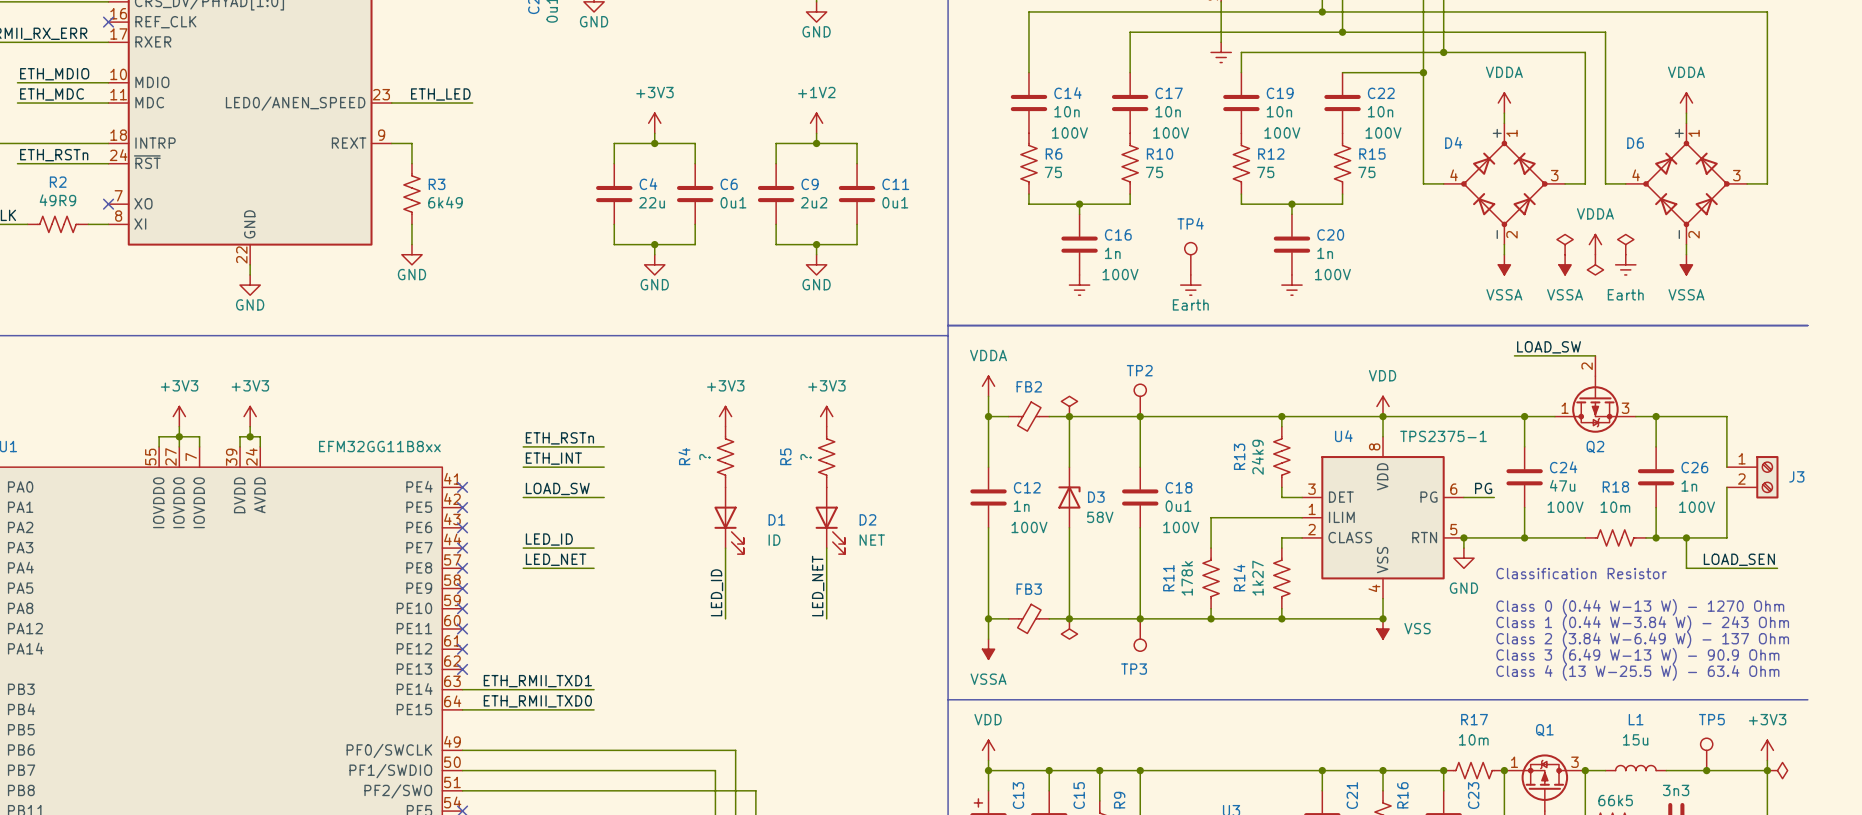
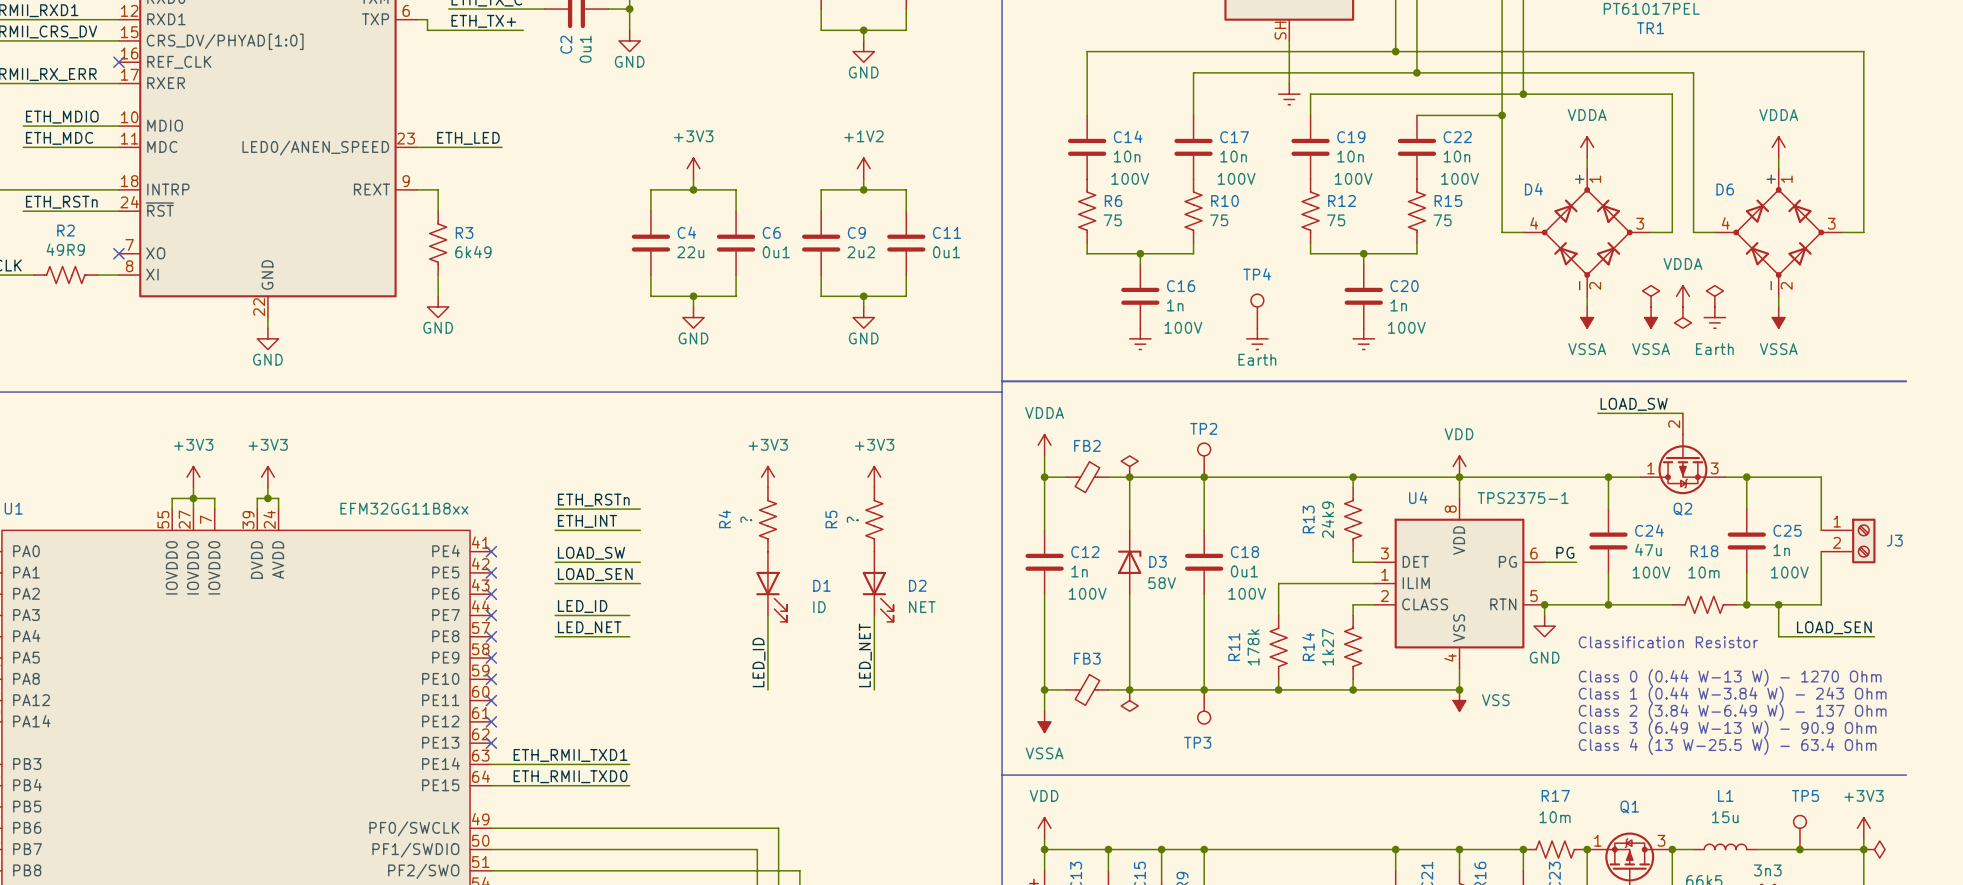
C26 name: C26 (1694, 467) -> C25 (1787, 530)
label: none -> LOAD_SEN (595, 574)
wire: none -> (555, 583) (640, 583)

